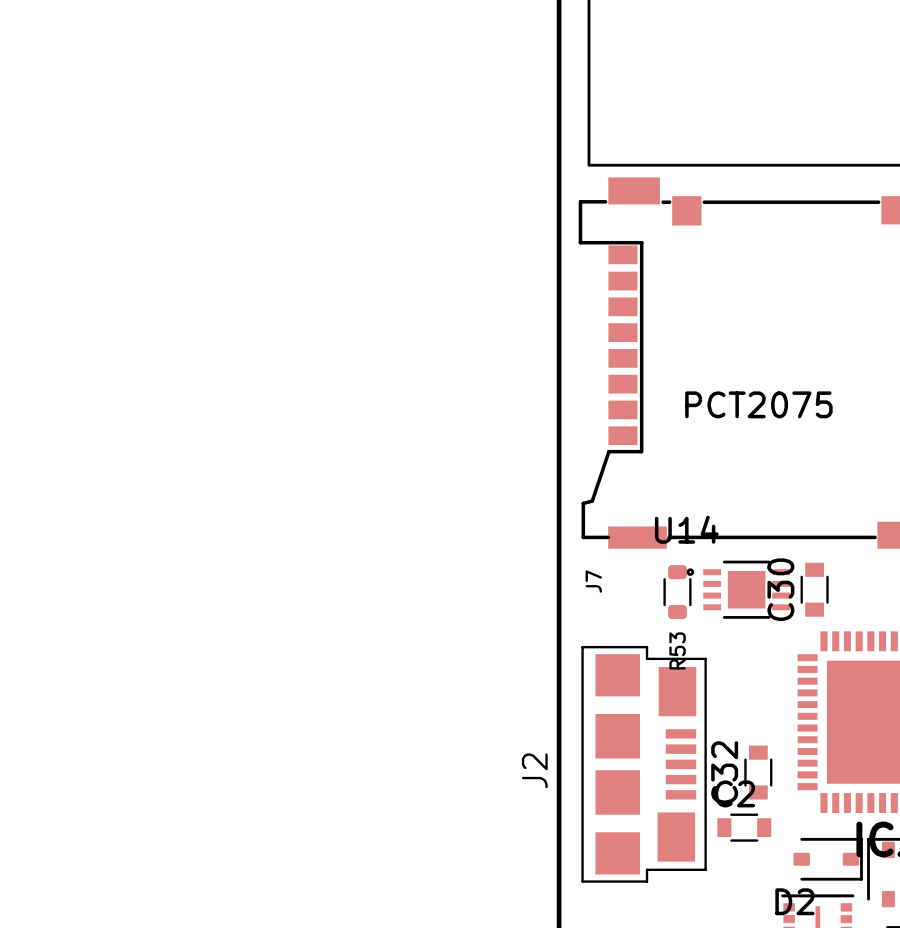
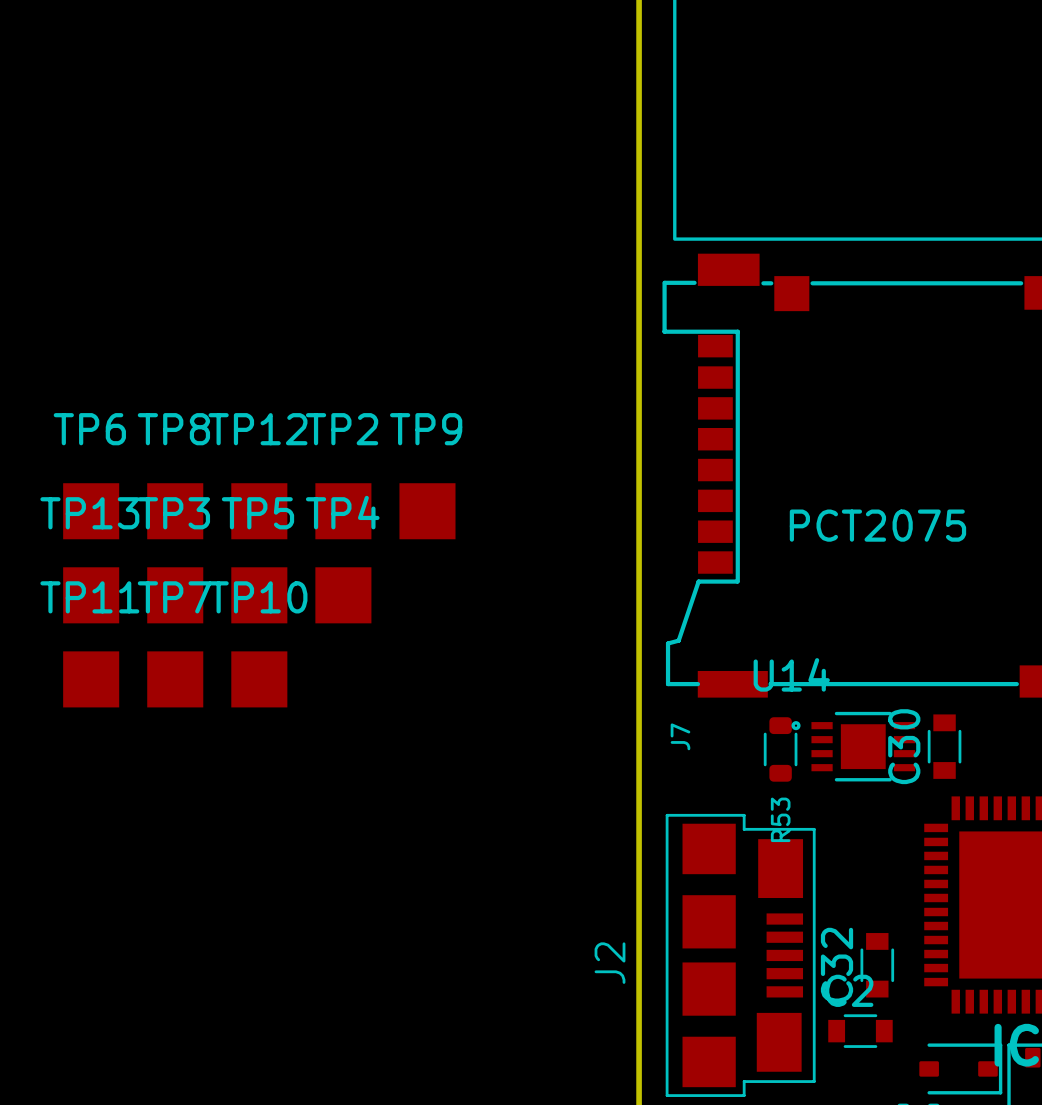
TP6: none -> (91, 511)
TP8: none -> (175, 511)
TP12: none -> (259, 511)
TP2: none -> (343, 511)
TP9: none -> (427, 511)
TP13: none -> (91, 595)
TP3: none -> (175, 595)
TP5: none -> (259, 595)
TP4: none -> (343, 595)
TP11: none -> (91, 679)
TP7: none -> (175, 679)
TP10: none -> (259, 679)

